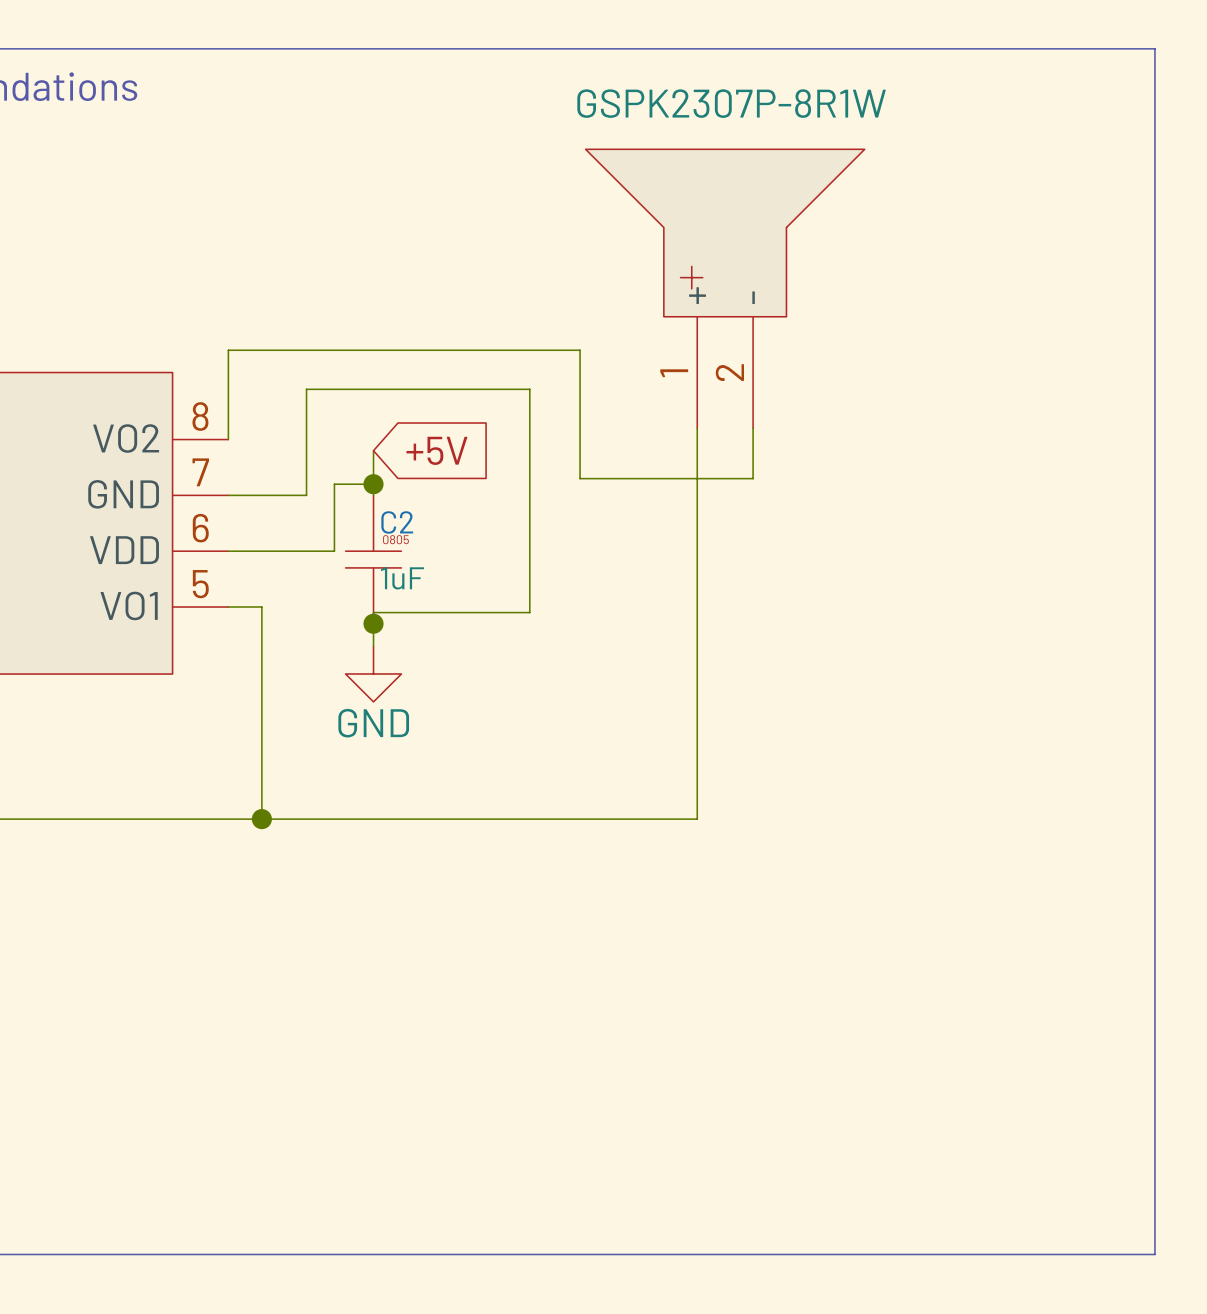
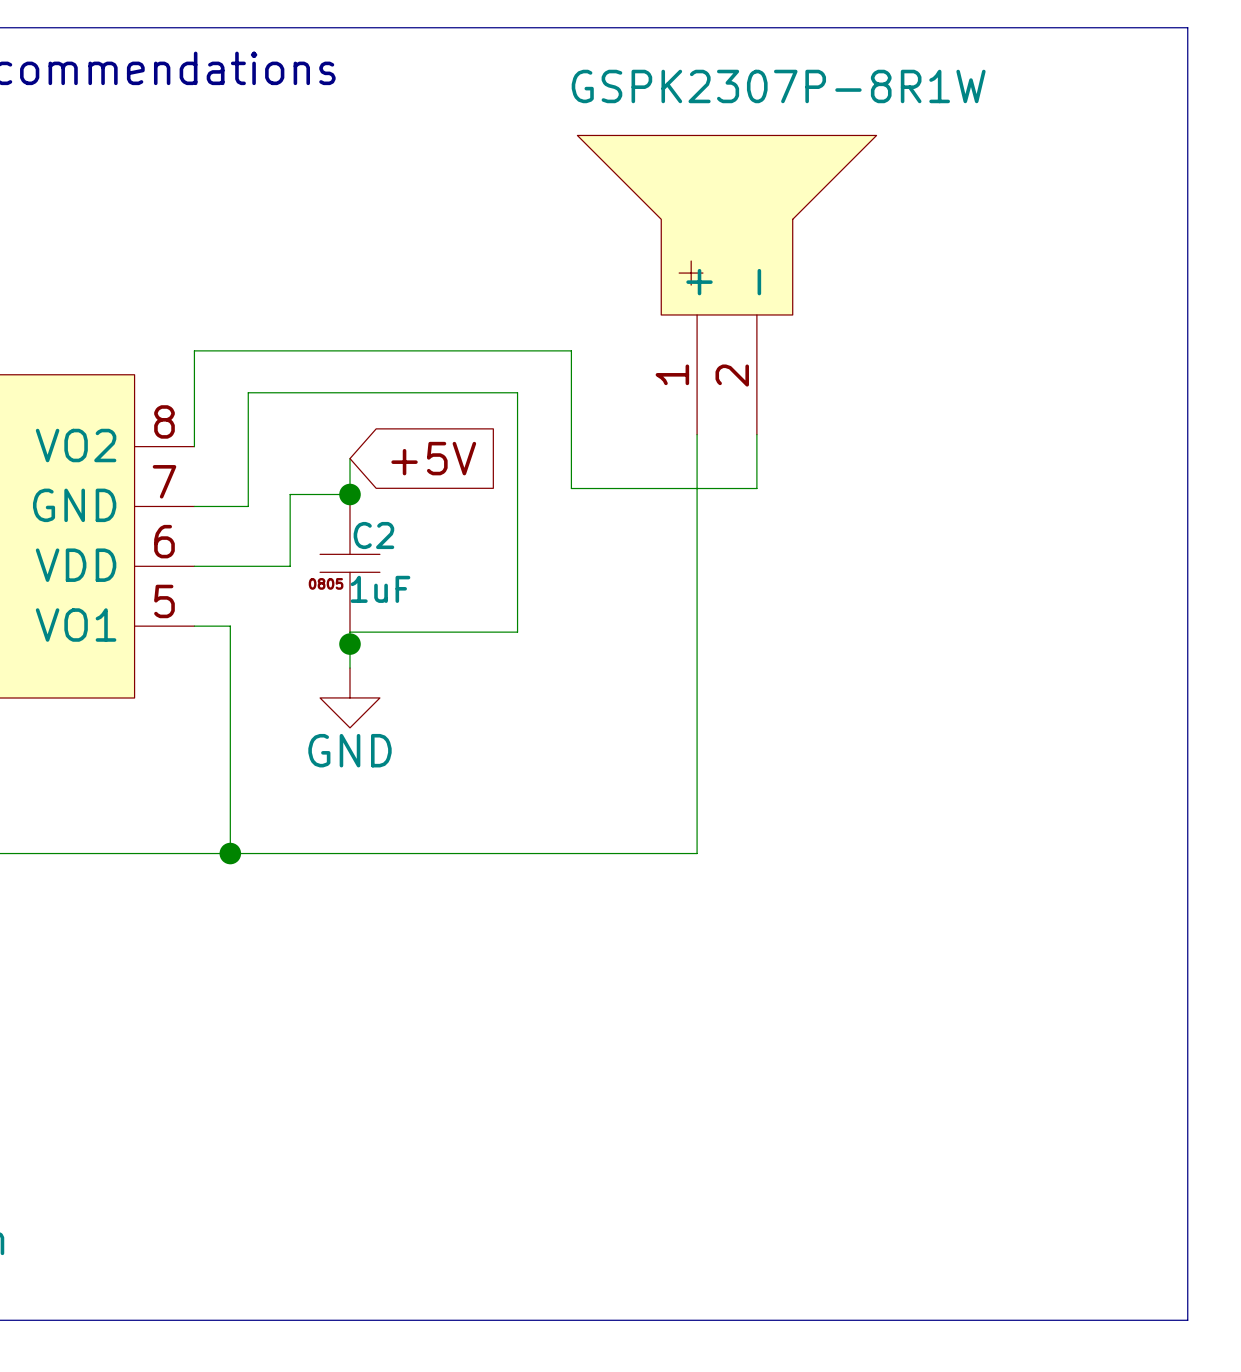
wire: (306, 389) (306, 495) (278, 495) -> (278, 392) (248, 392) (248, 506)
wire: (334, 484) (334, 551) (317, 551) -> (308, 494) (290, 494) (290, 566)
C2 rotation: 0° (373, 559) -> 180° (350, 563)

